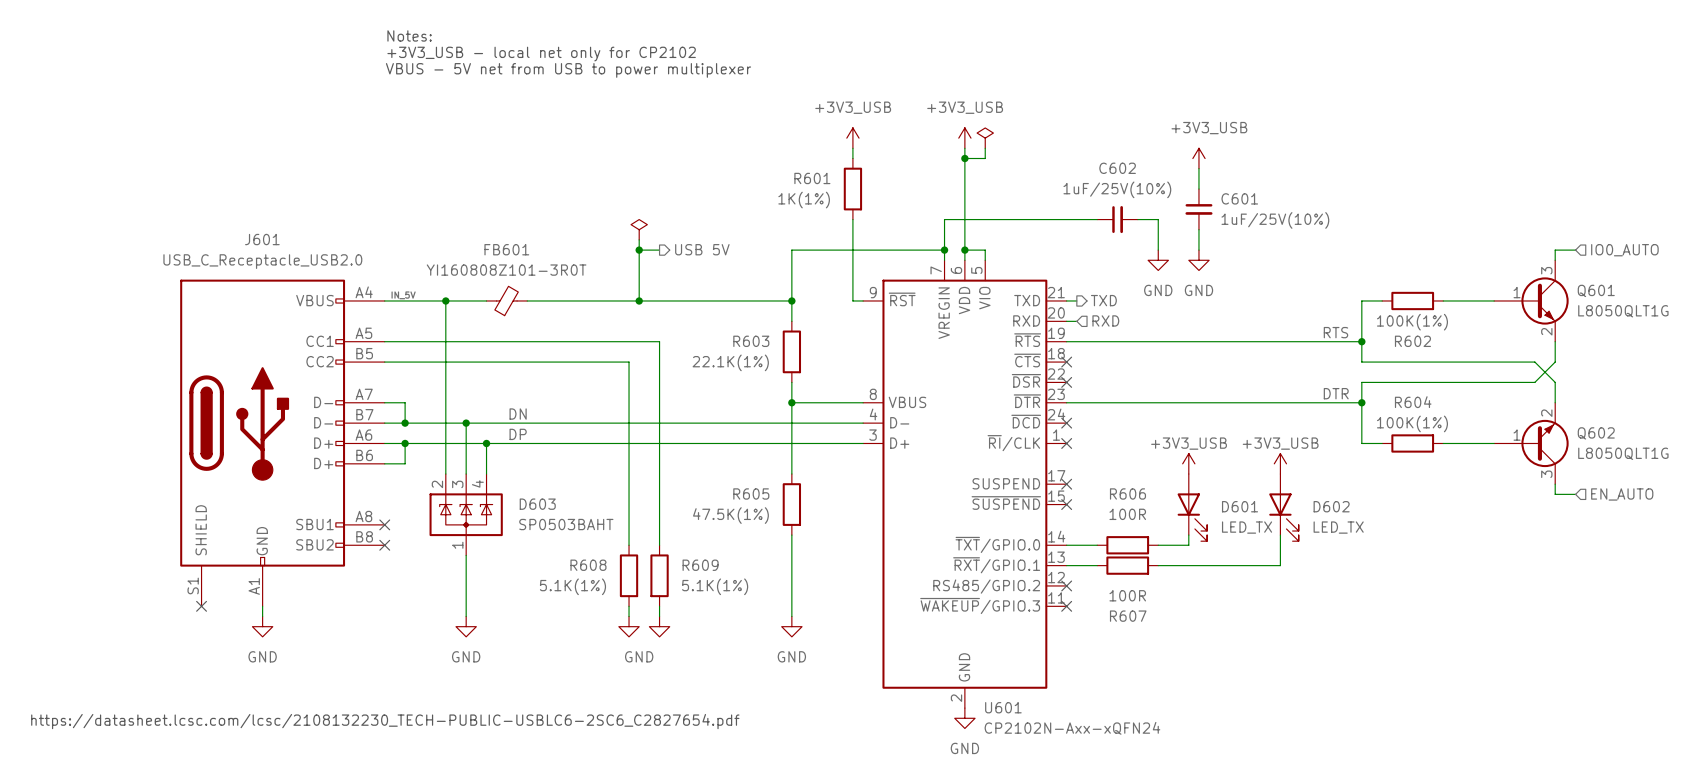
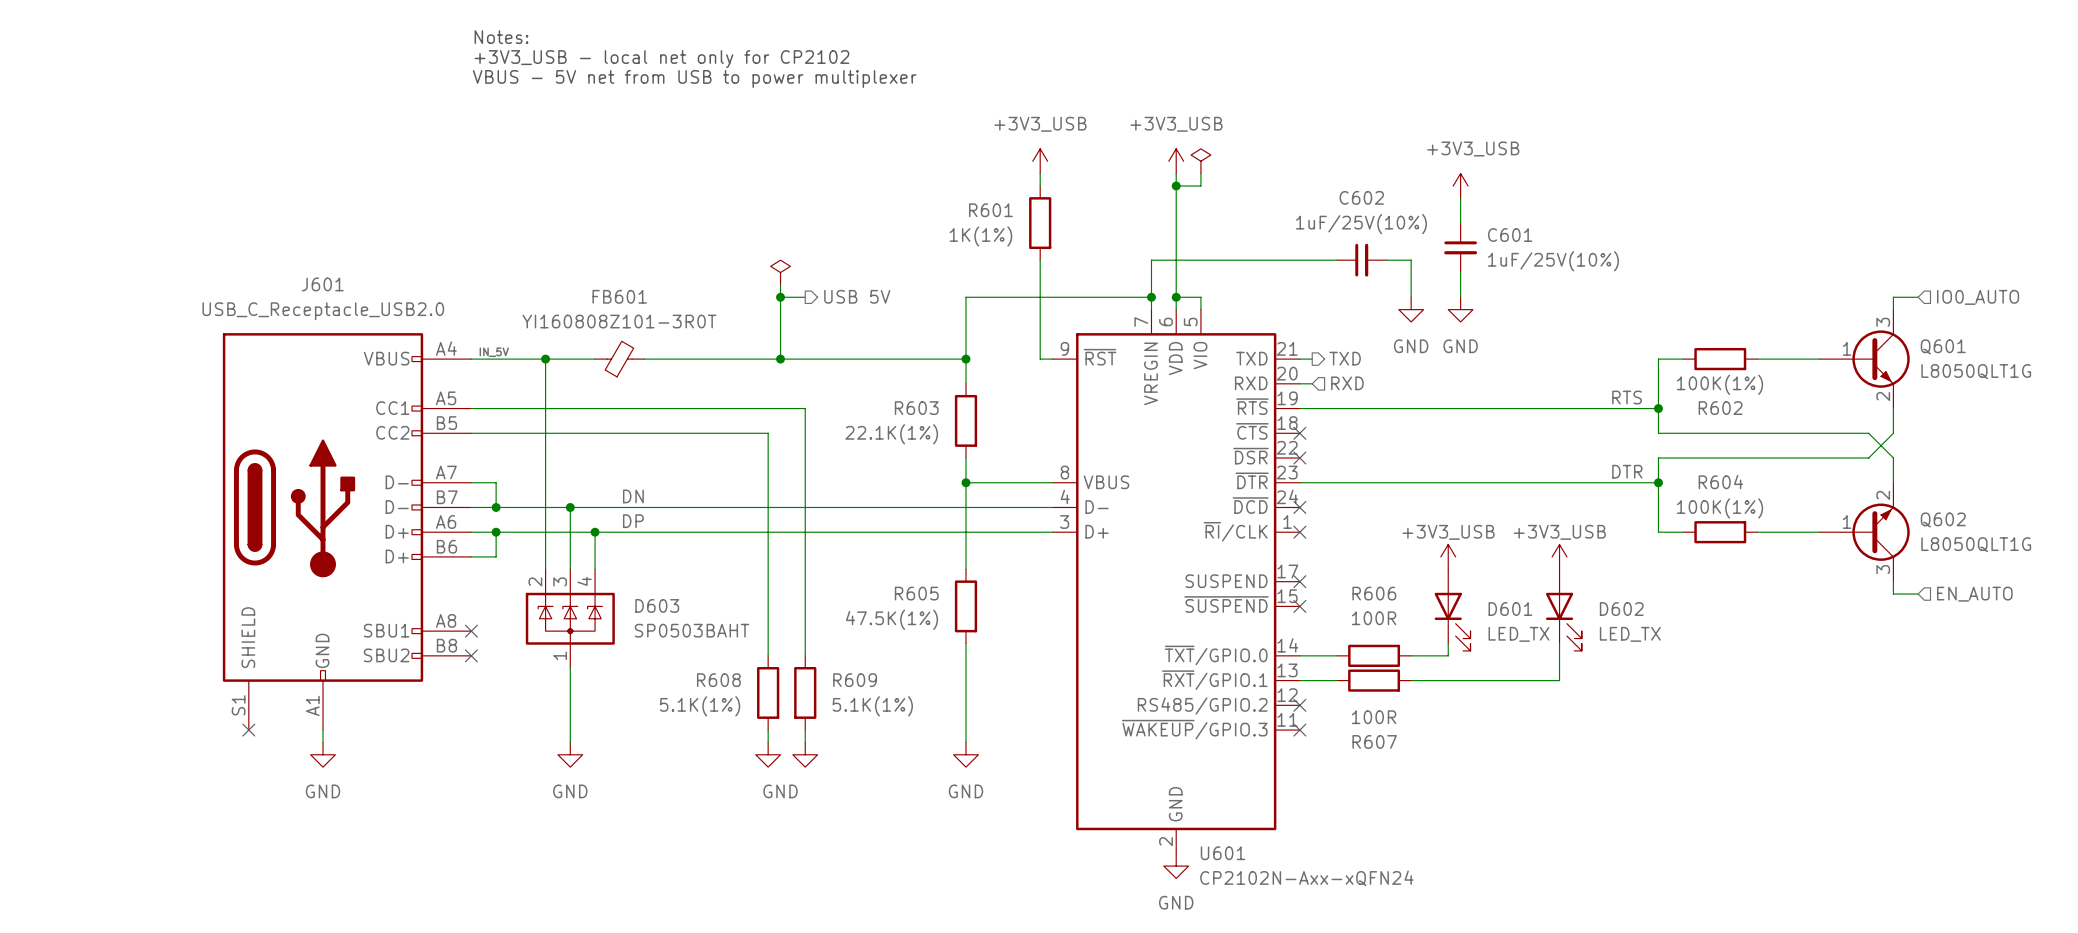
text: https://datasheet.lcsc.com/lcsc/2108132230_TECH-PUBLIC-USBLC6-2SC6_C2827654.pdf (385, 721) -> none

